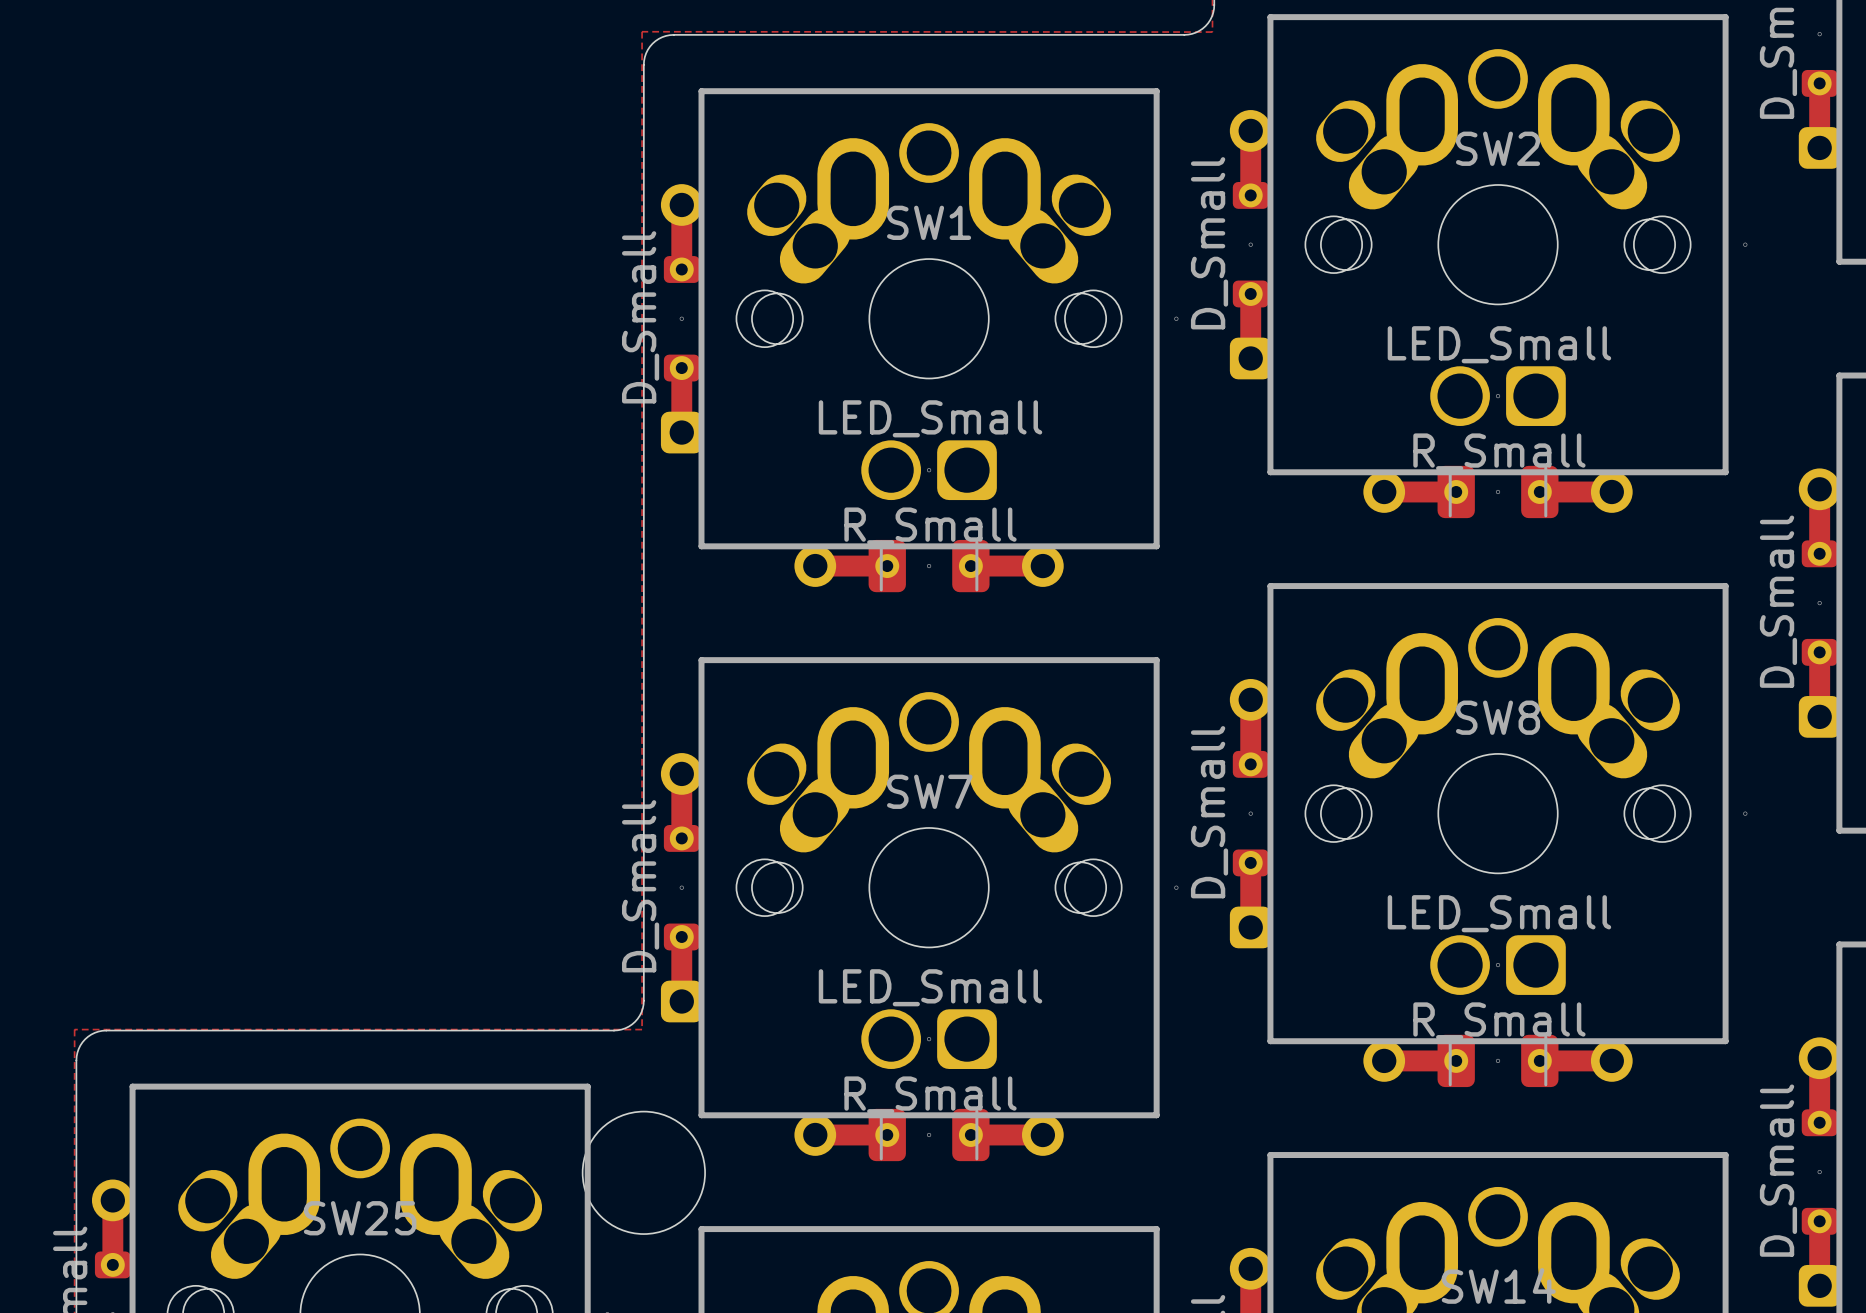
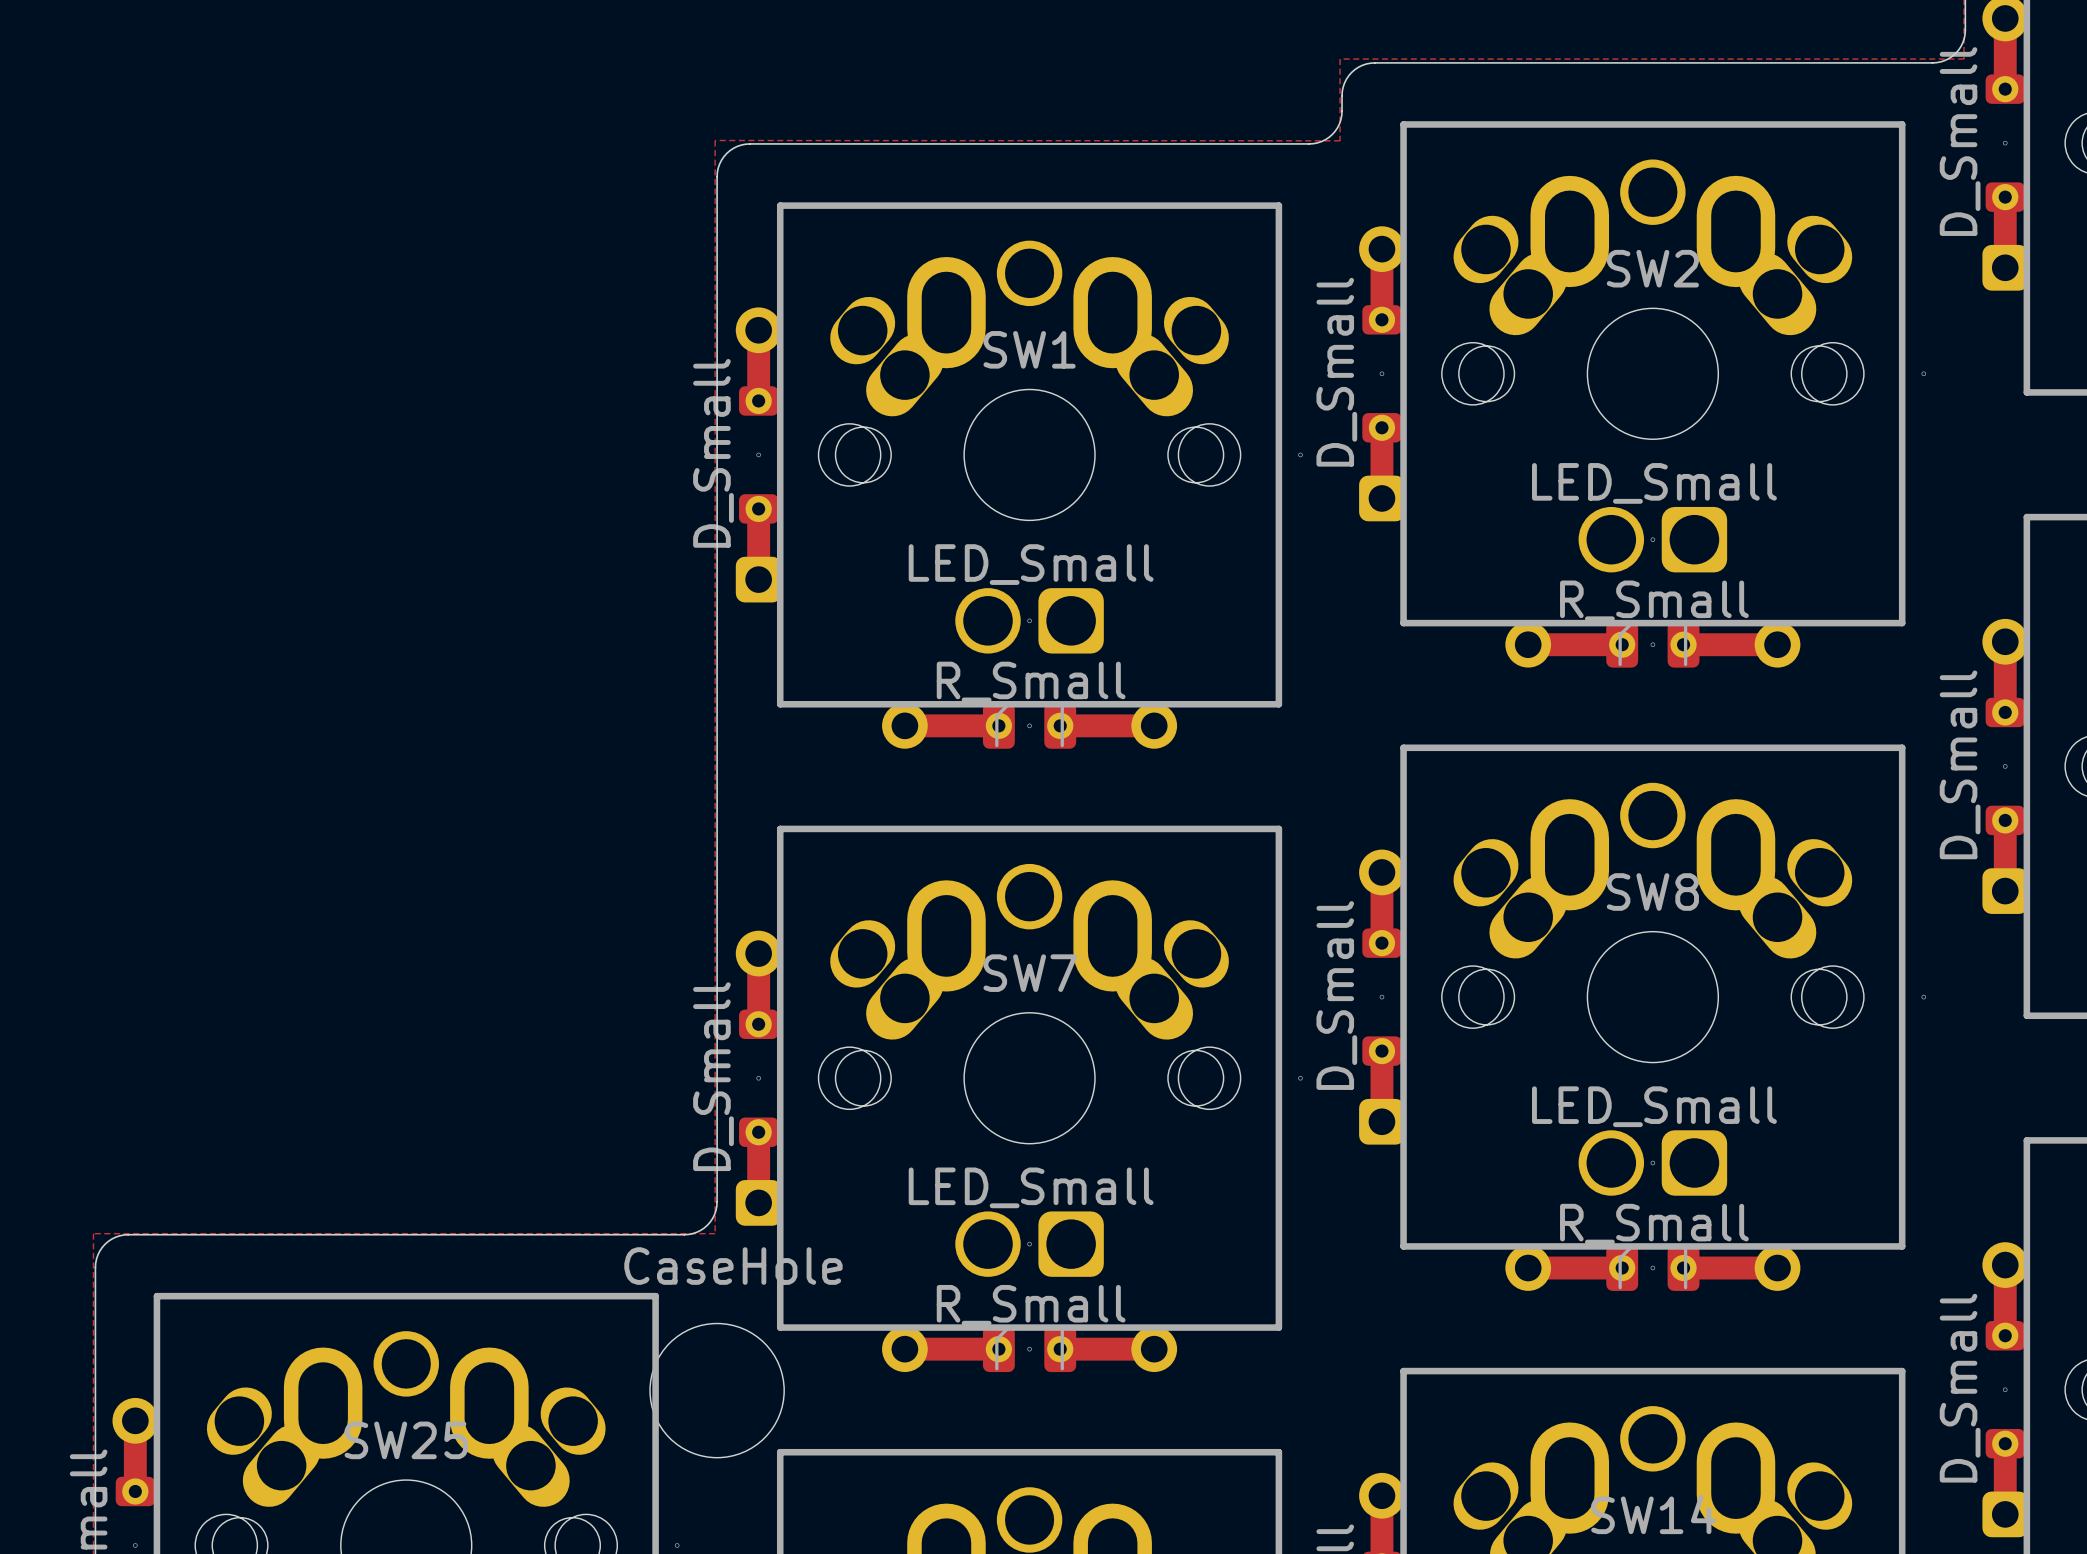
part footprint: [1363, 465, 1633, 519] -> [1505, 621, 1801, 668]
part footprint: [794, 539, 1064, 593] -> [882, 702, 1178, 749]
part footprint: [1363, 1034, 1633, 1088] -> [1505, 1245, 1801, 1291]
part value: none -> CaseHole (733, 1266)
part footprint: [794, 1108, 1064, 1162] -> [882, 1326, 1178, 1373]

